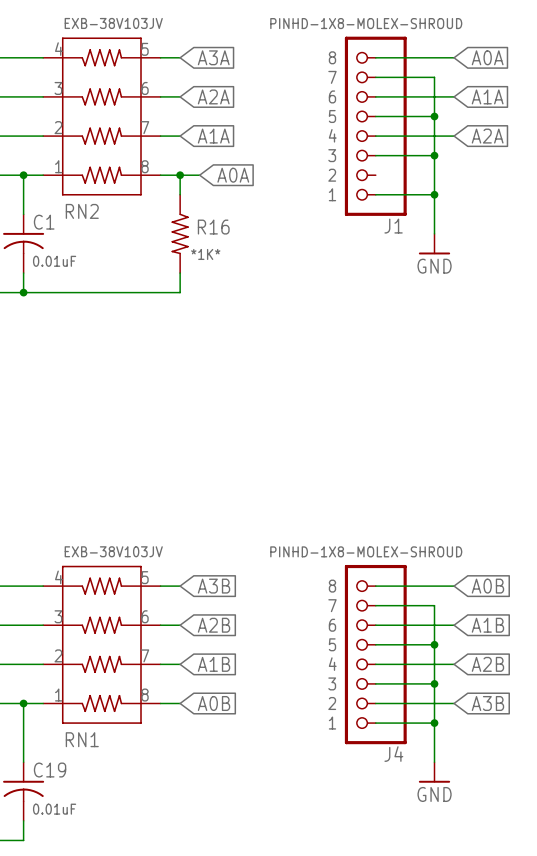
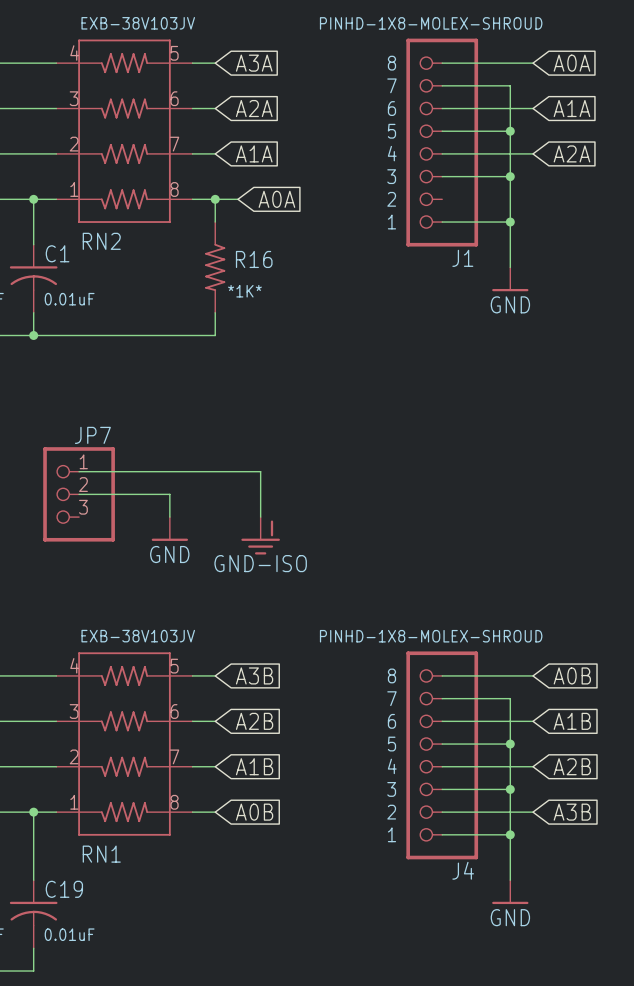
wire: none -> (79, 471) (260, 471) (260, 517)
wire: none -> (79, 494) (169, 494) (169, 517)
JP7: none -> (79, 494)
power symbol: none -> GND (169, 528)
power symbol: none -> GND-ISO (260, 535)

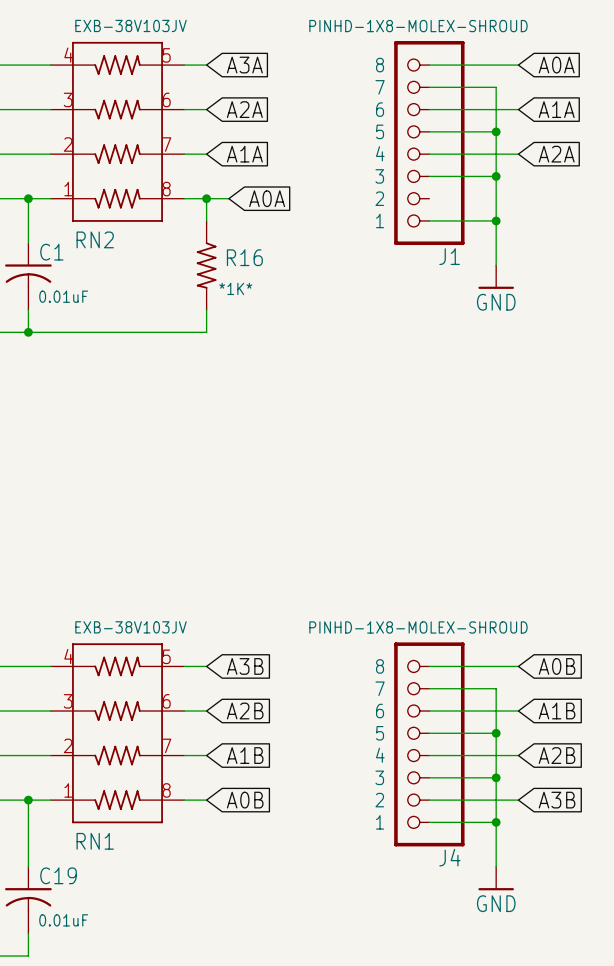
wire: (79, 471) (260, 471) (260, 517) -> none
wire: (79, 494) (169, 494) (169, 517) -> none
JP7: (79, 494) -> none
power symbol: GND (169, 528) -> none
power symbol: GND-ISO (260, 535) -> none

